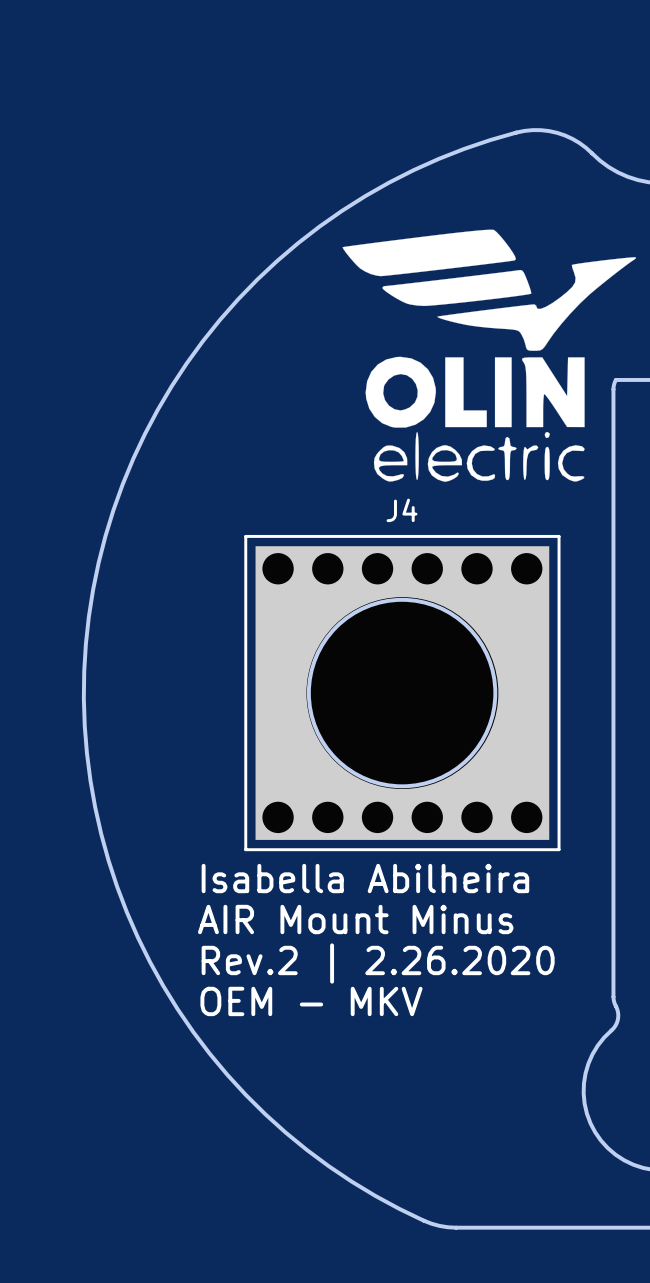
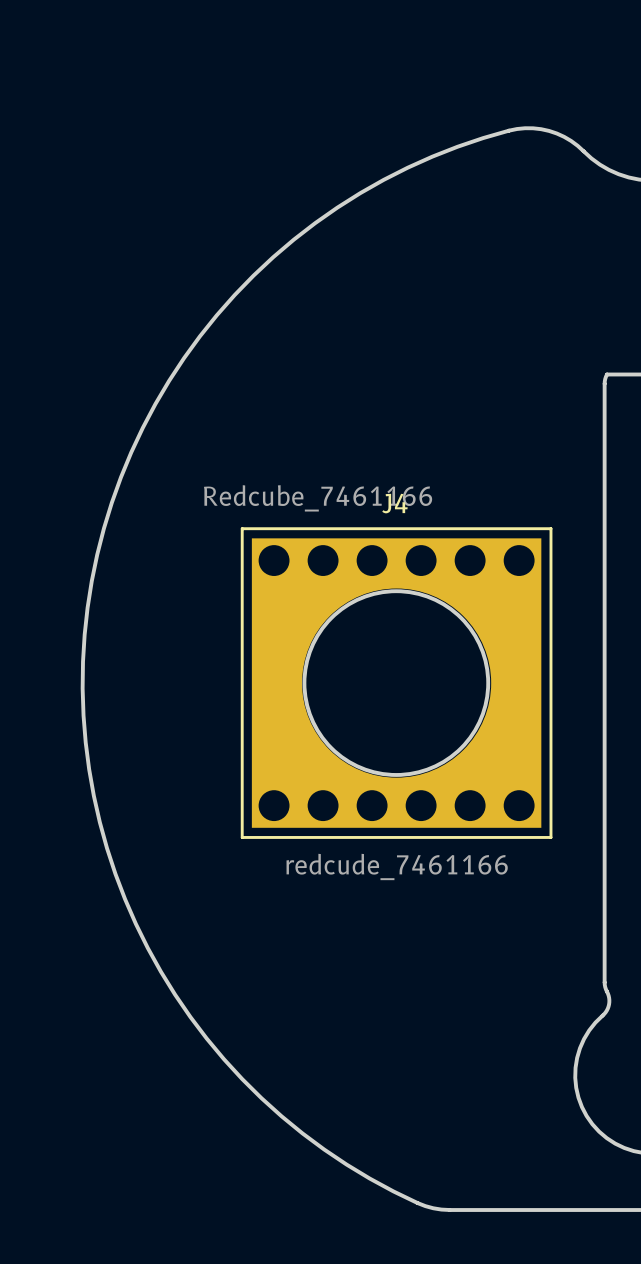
drawing: [342, 229, 636, 482] -> none
J4 text: none -> Redcube_7461166 (318, 498)
J4 value: none -> redcude_7461166 (397, 866)
text: Isabella Abilheira (365, 878) -> none
text: AIR Mount Minus (355, 919) -> none
text: Rev.2 | 2.26.2020 (378, 963) -> none
text: OEM - MKV (311, 1001) -> none

